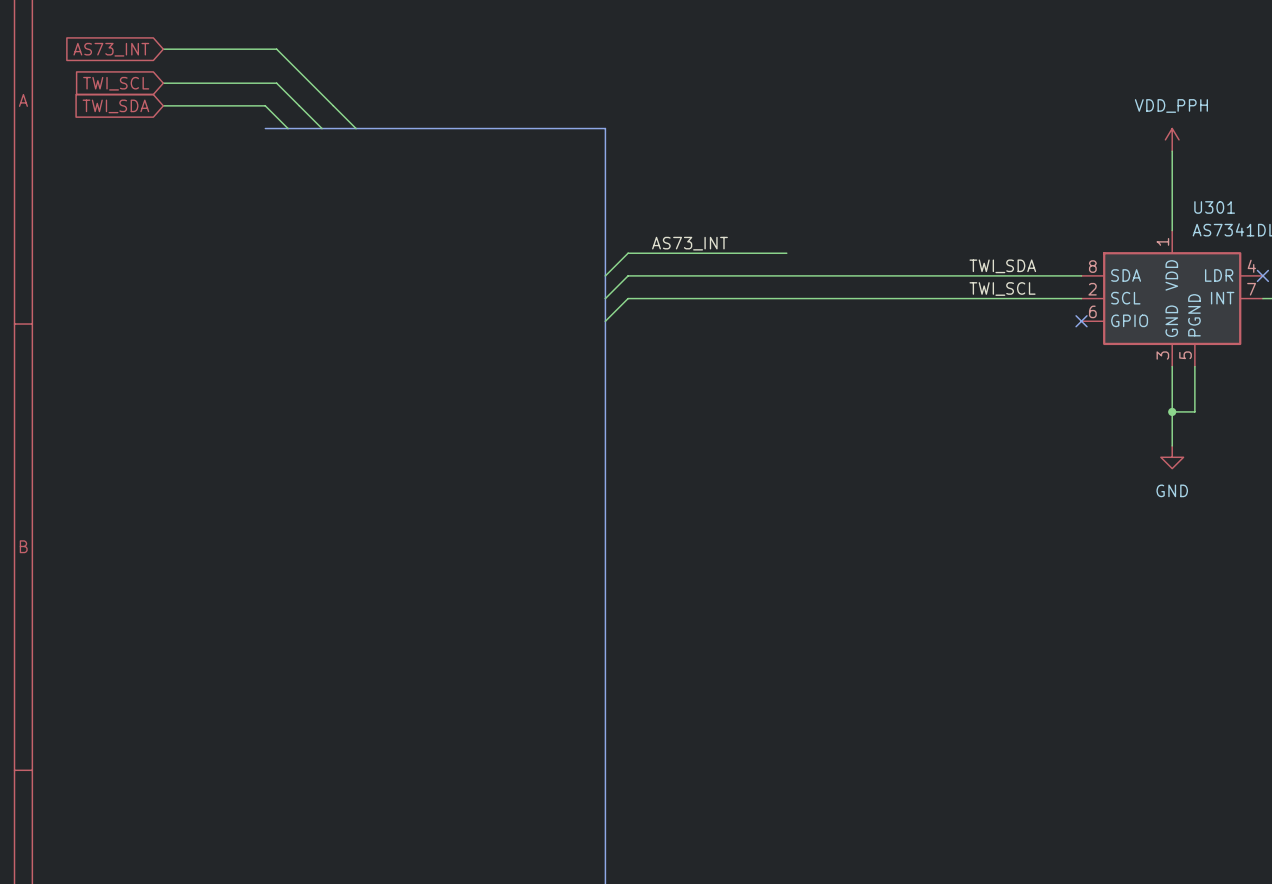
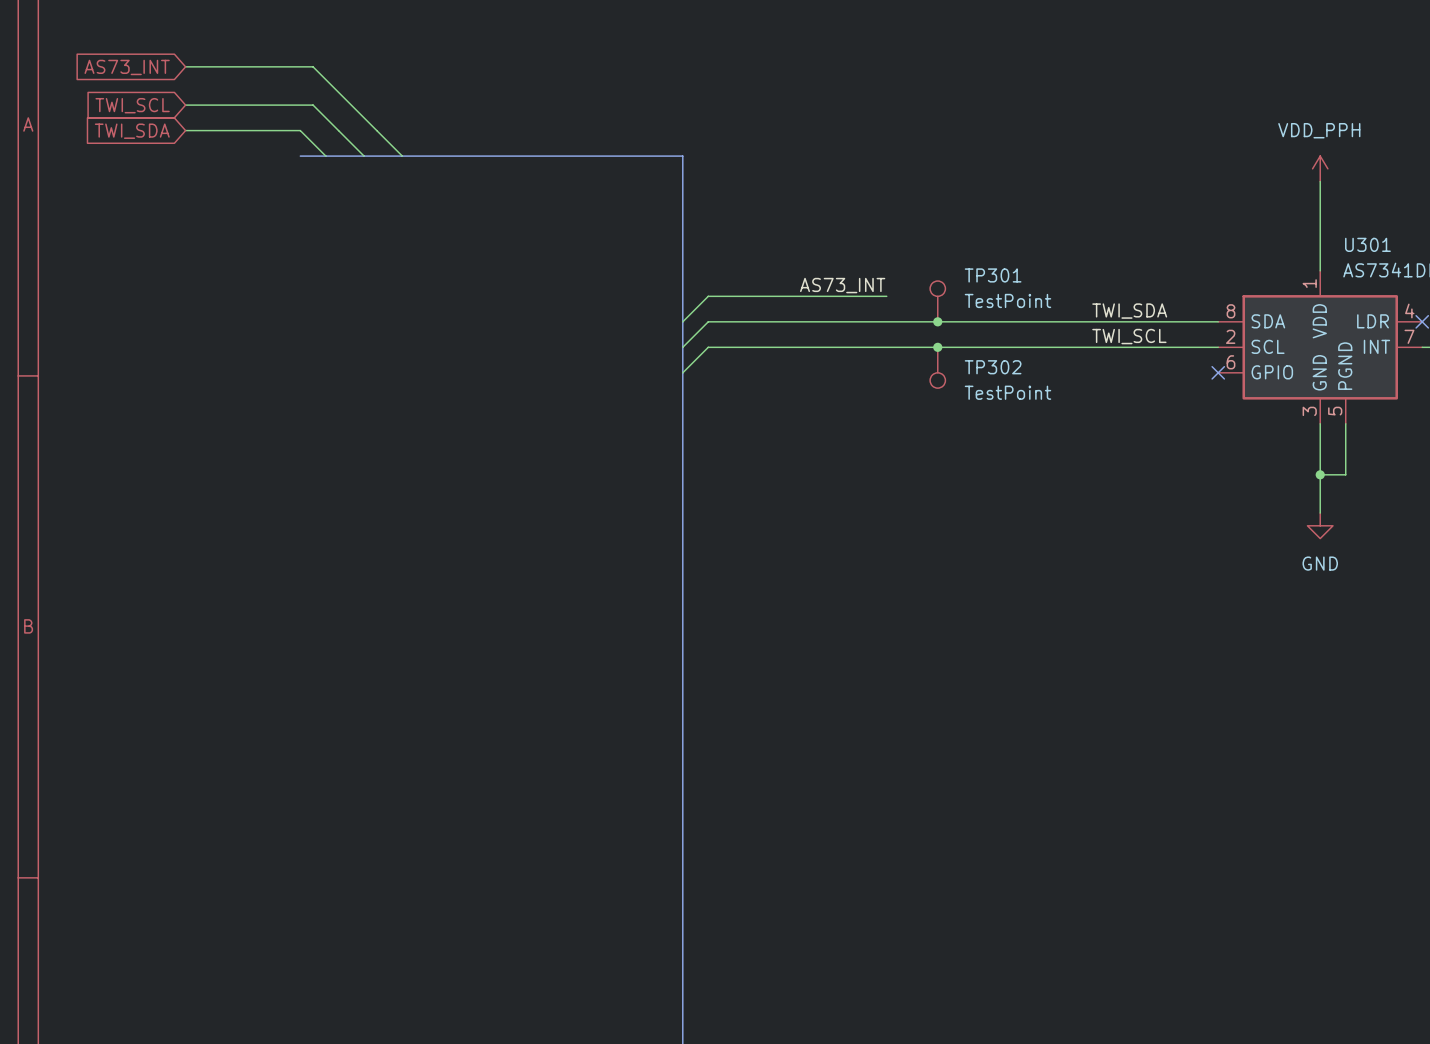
label position: AS73_INT (689, 243) -> AS73_INT (842, 285)
TP301: none -> TestPoint (937, 301)
junction: none -> (937, 321)
junction: none -> (937, 347)
TP302: none -> TestPoint (937, 367)

